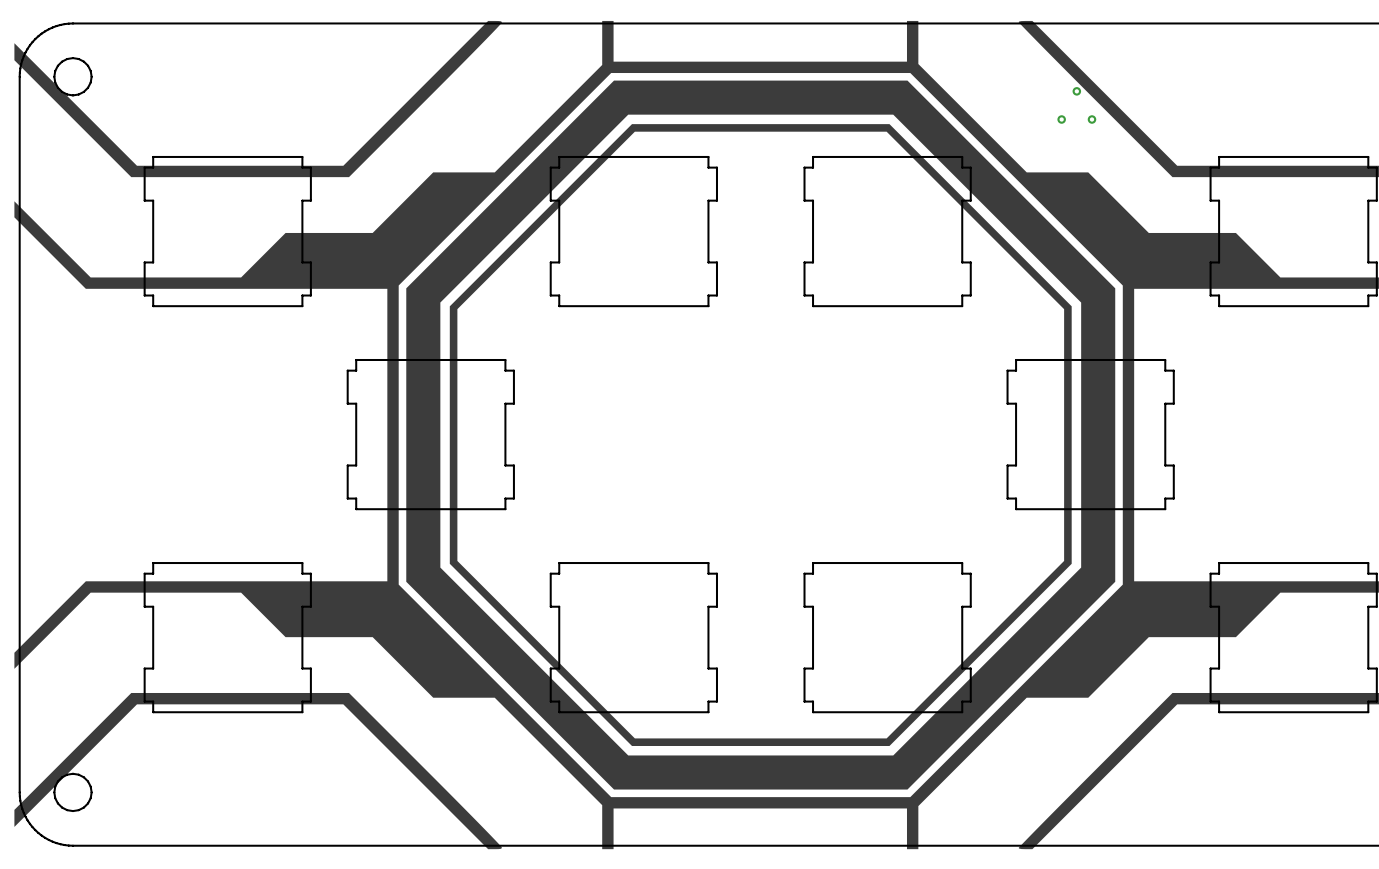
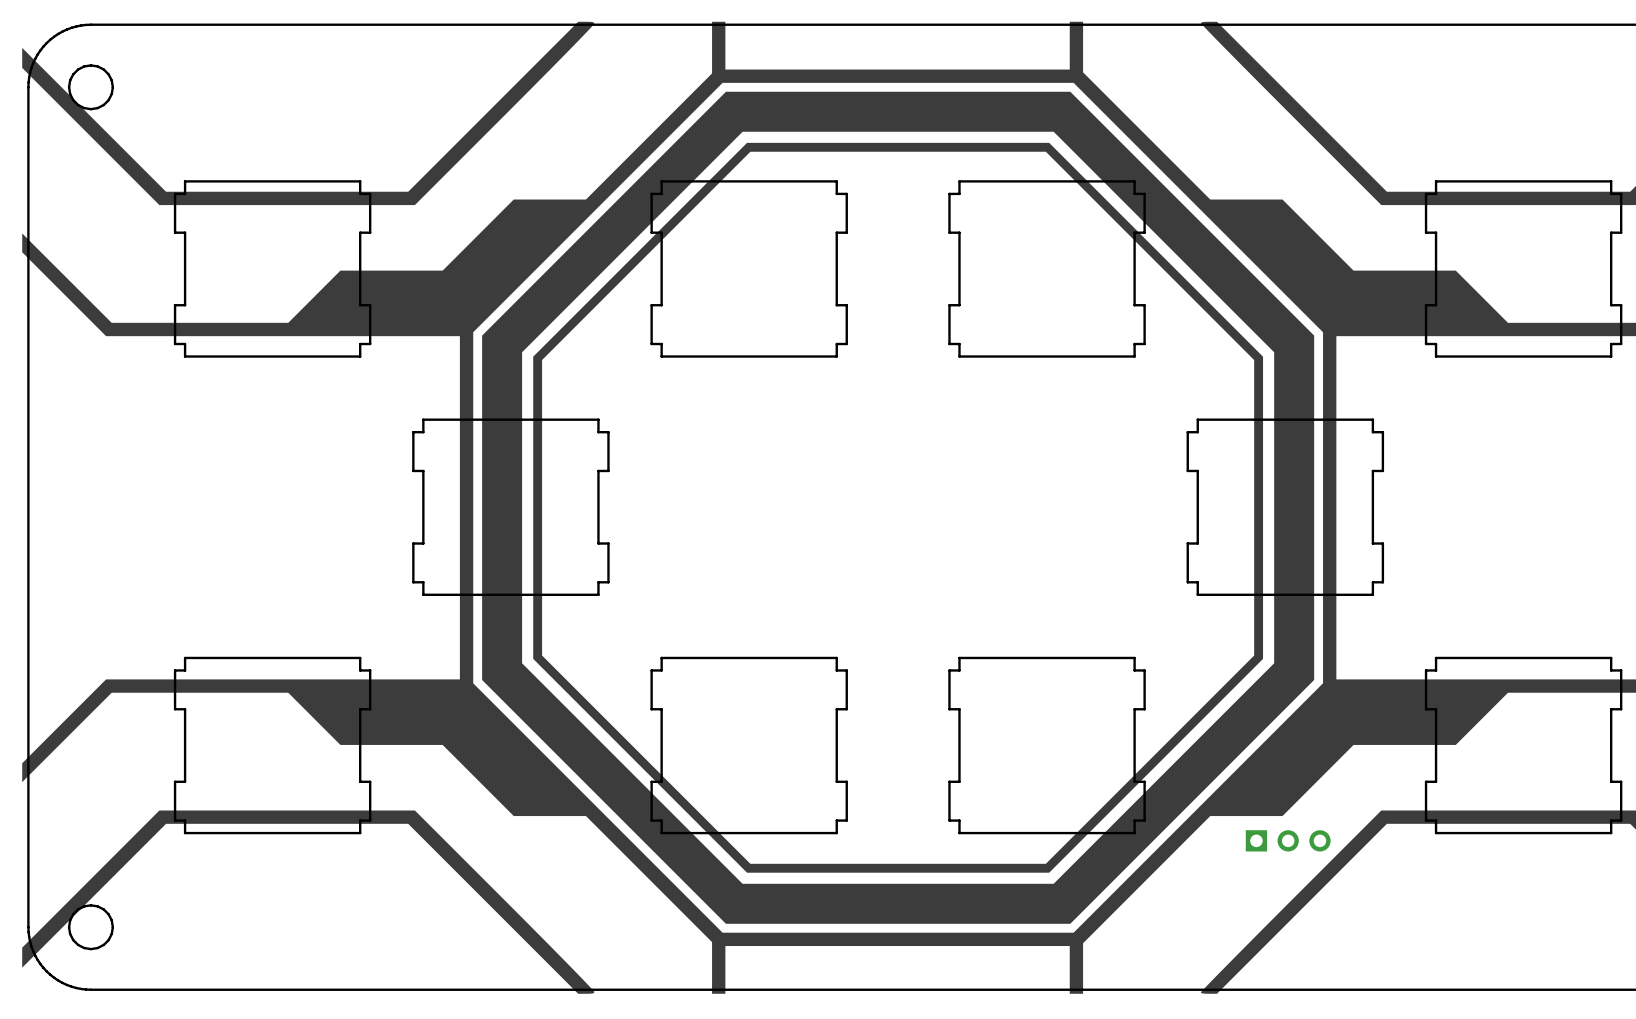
via: (1076, 91) -> none
via: (1061, 119) -> none
via: (1091, 119) -> none
part: none -> (1288, 840)

